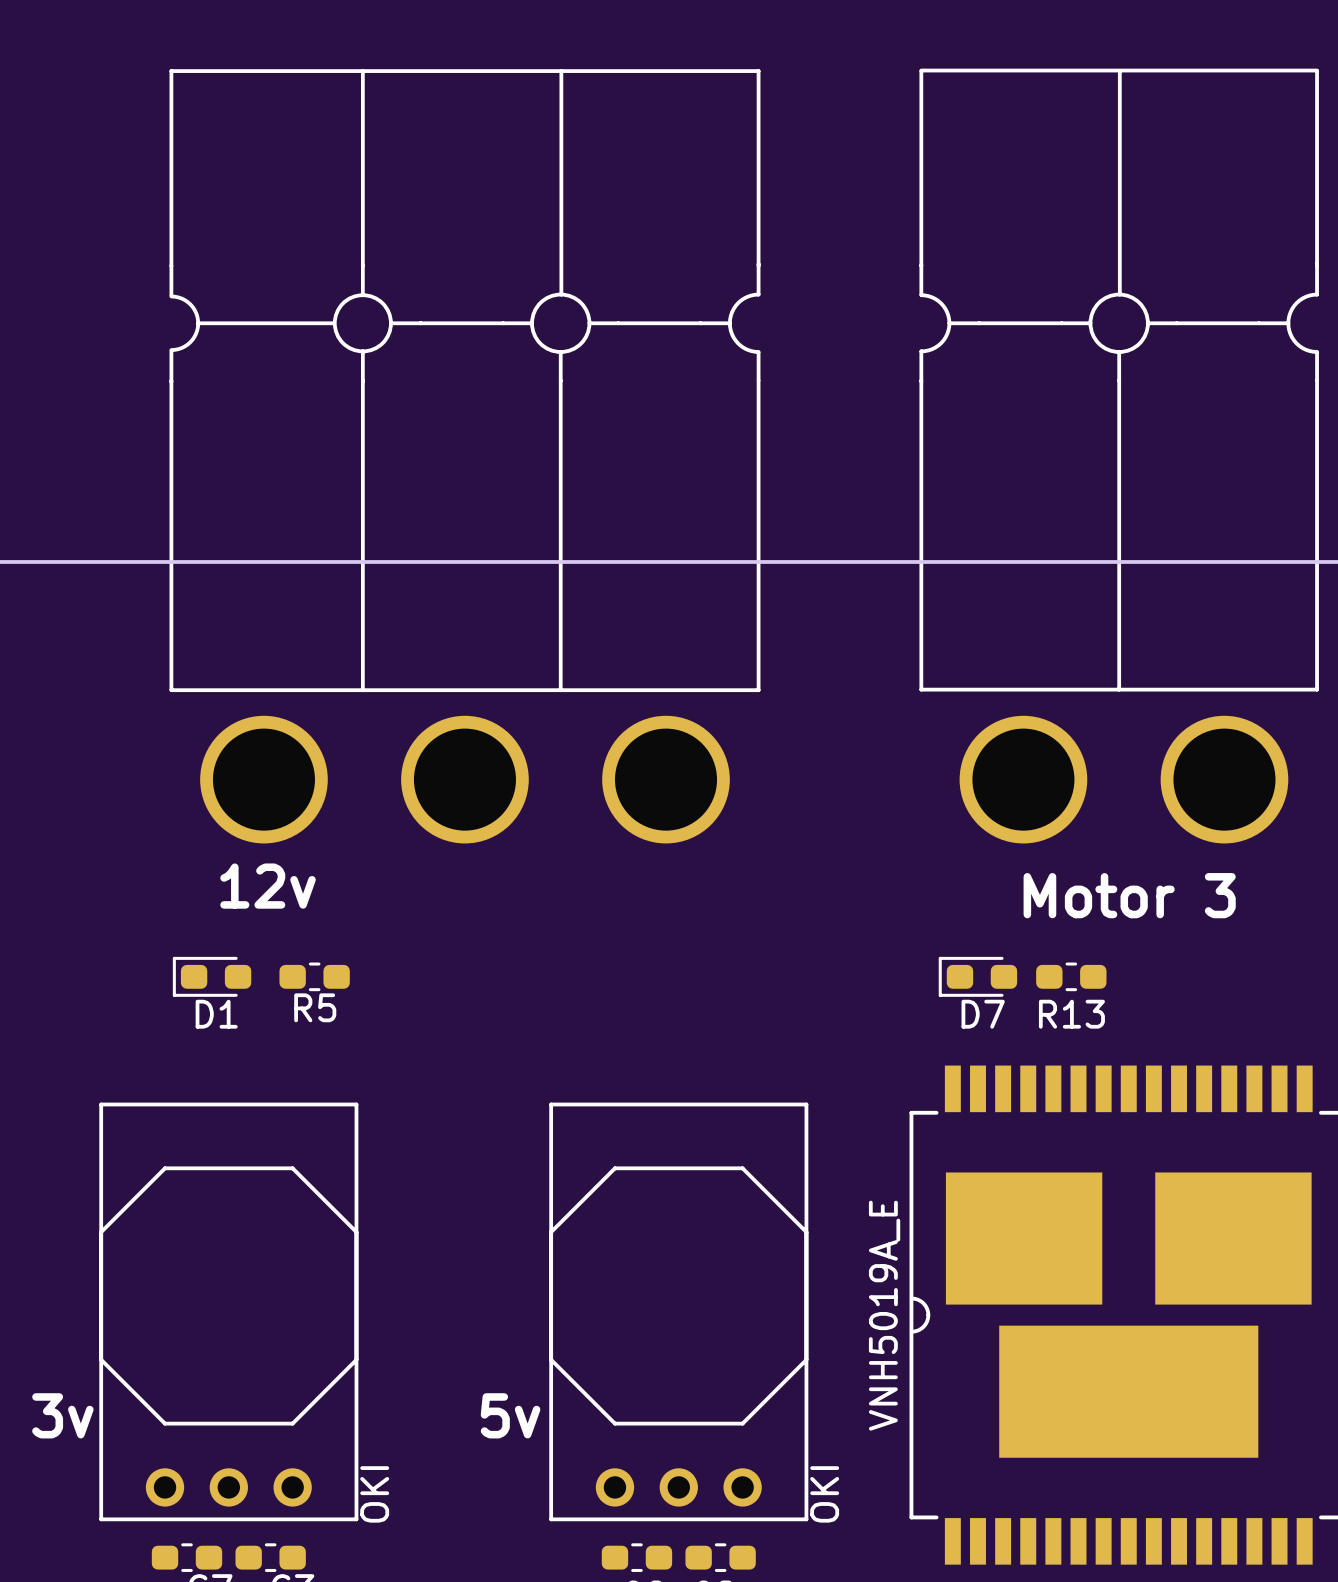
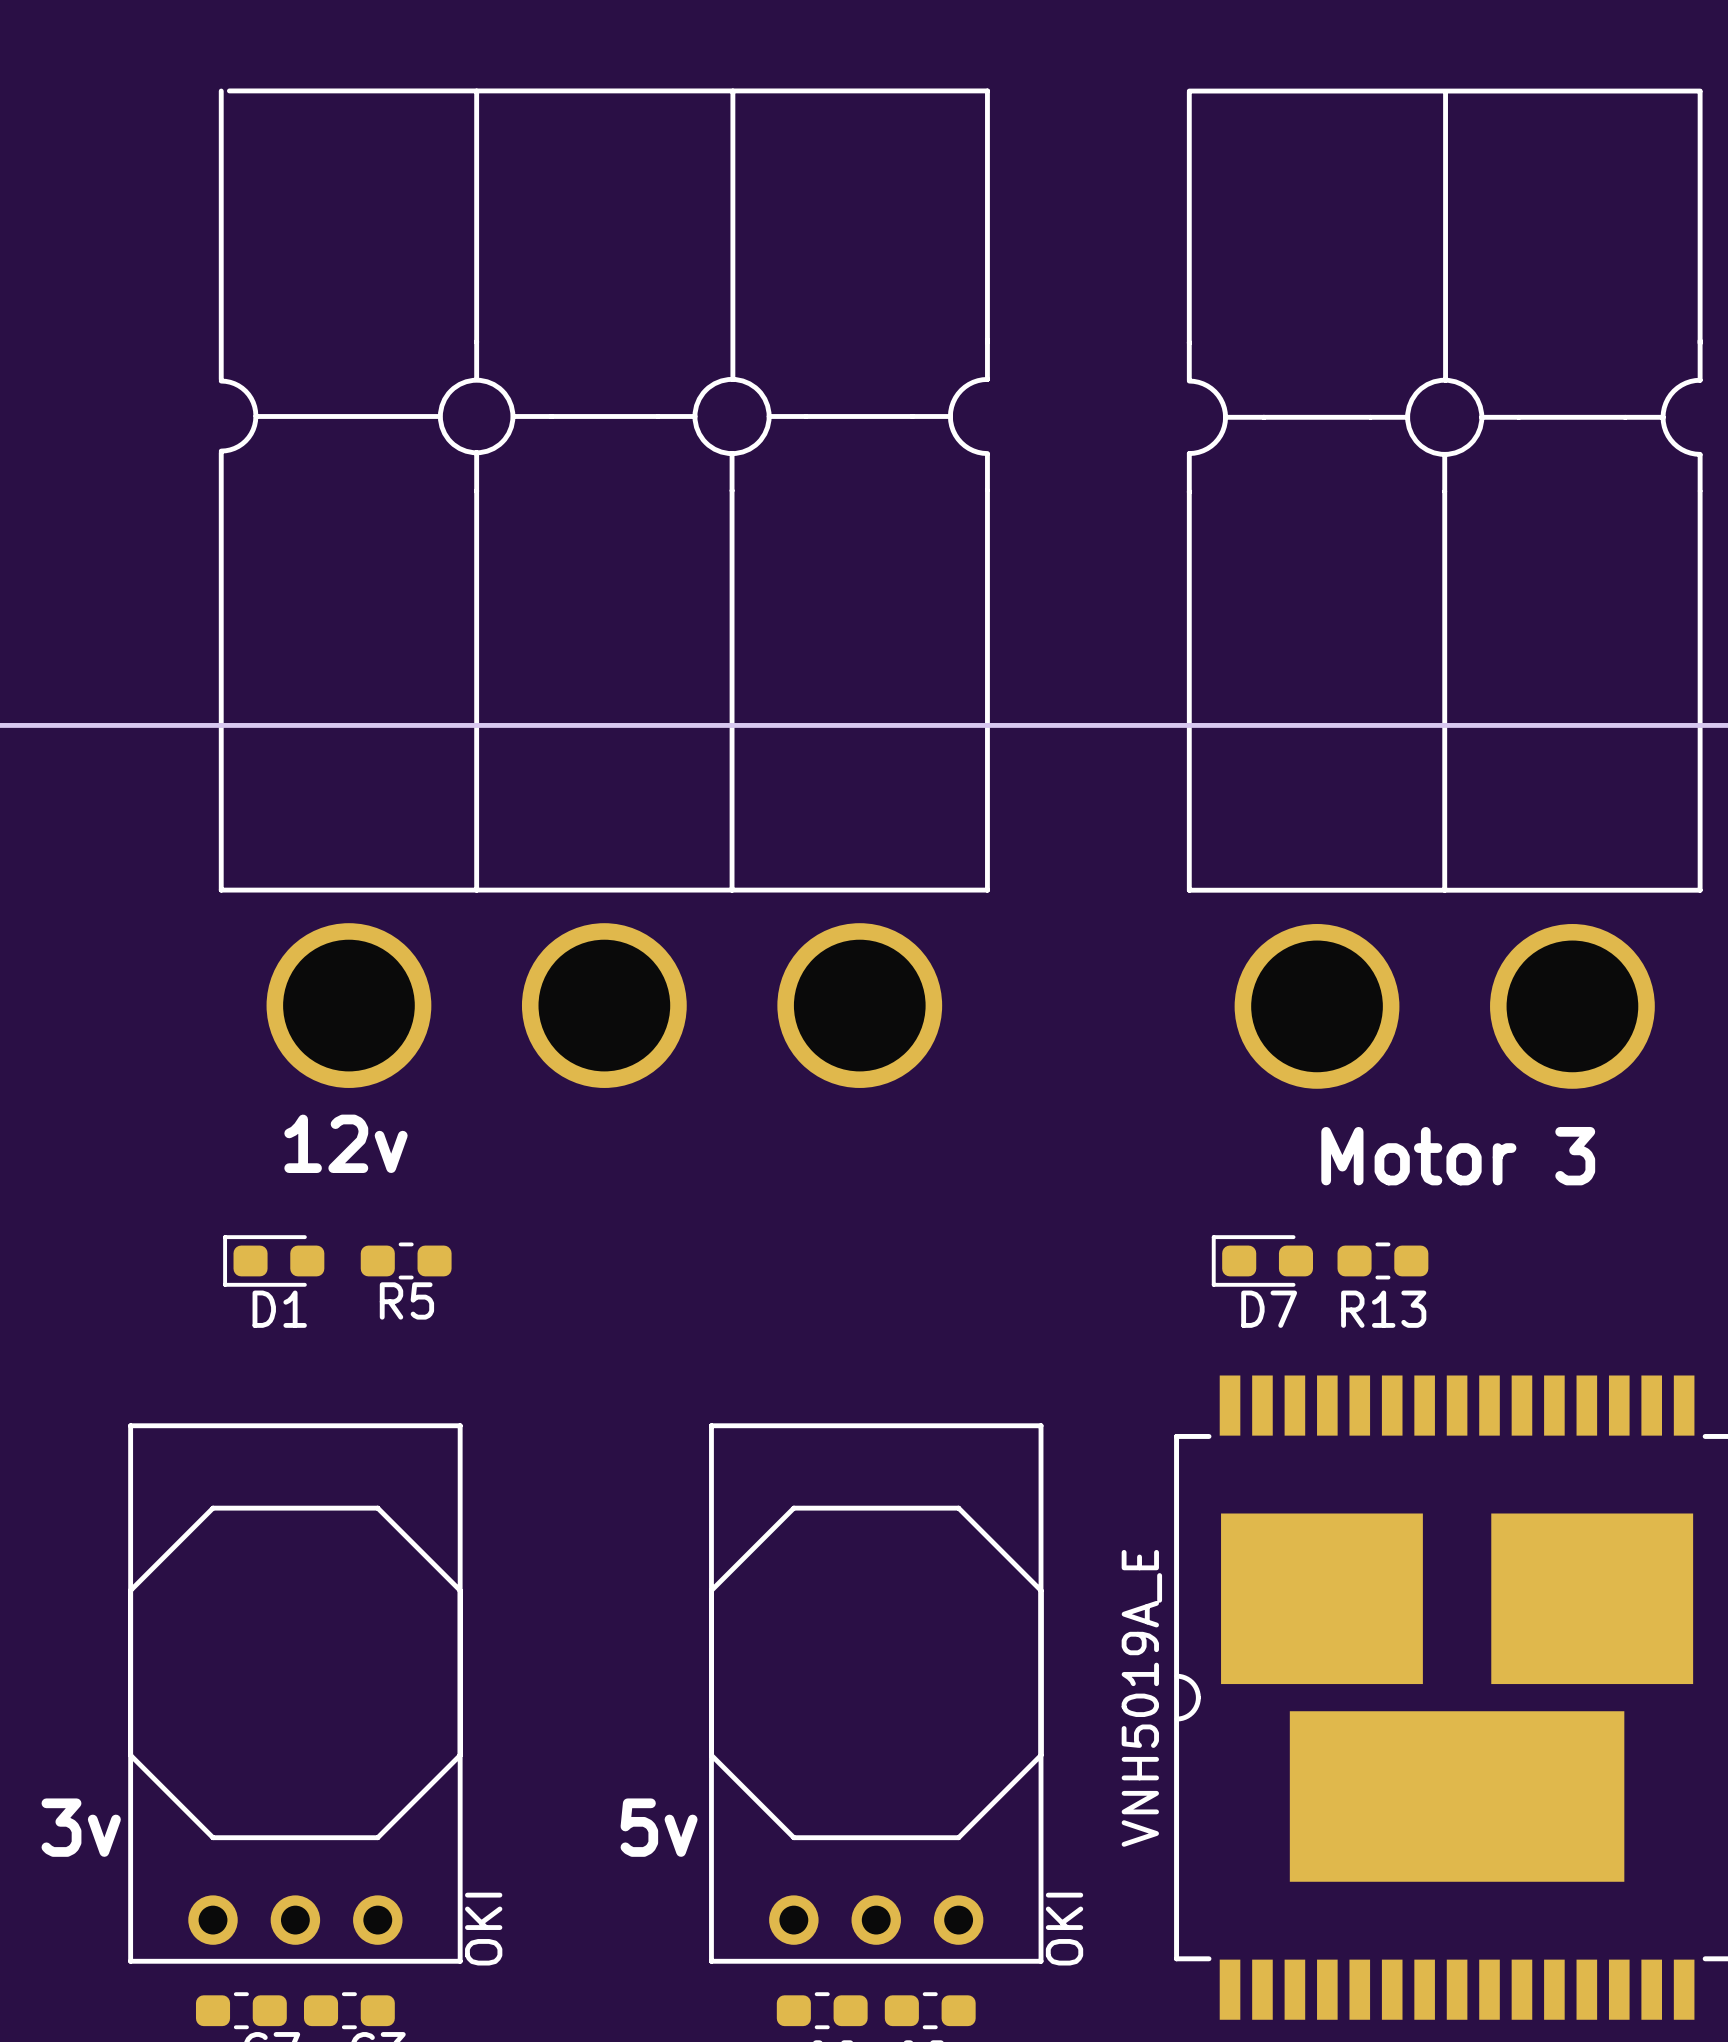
part footprint: [919, 68, 1319, 844] -> [1186, 88, 1703, 1089]
part footprint: [169, 69, 761, 844] -> [218, 88, 990, 1088]

